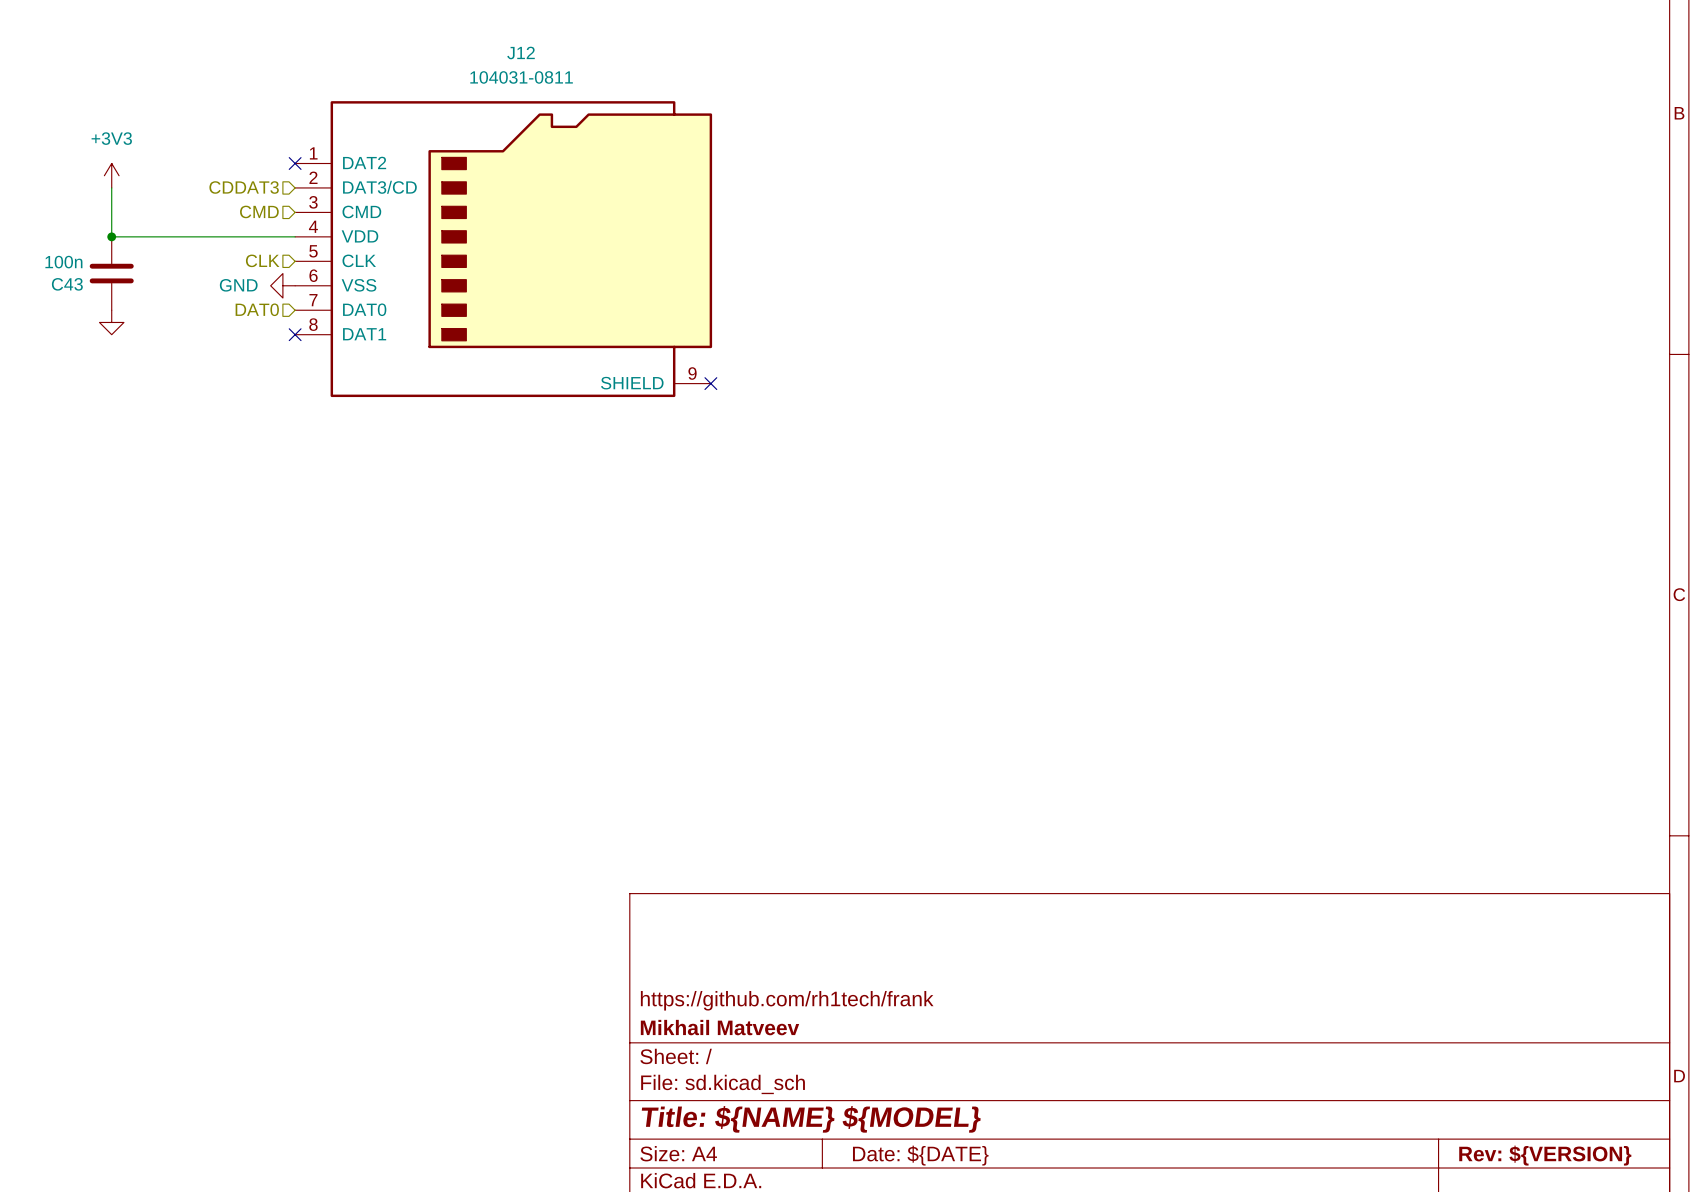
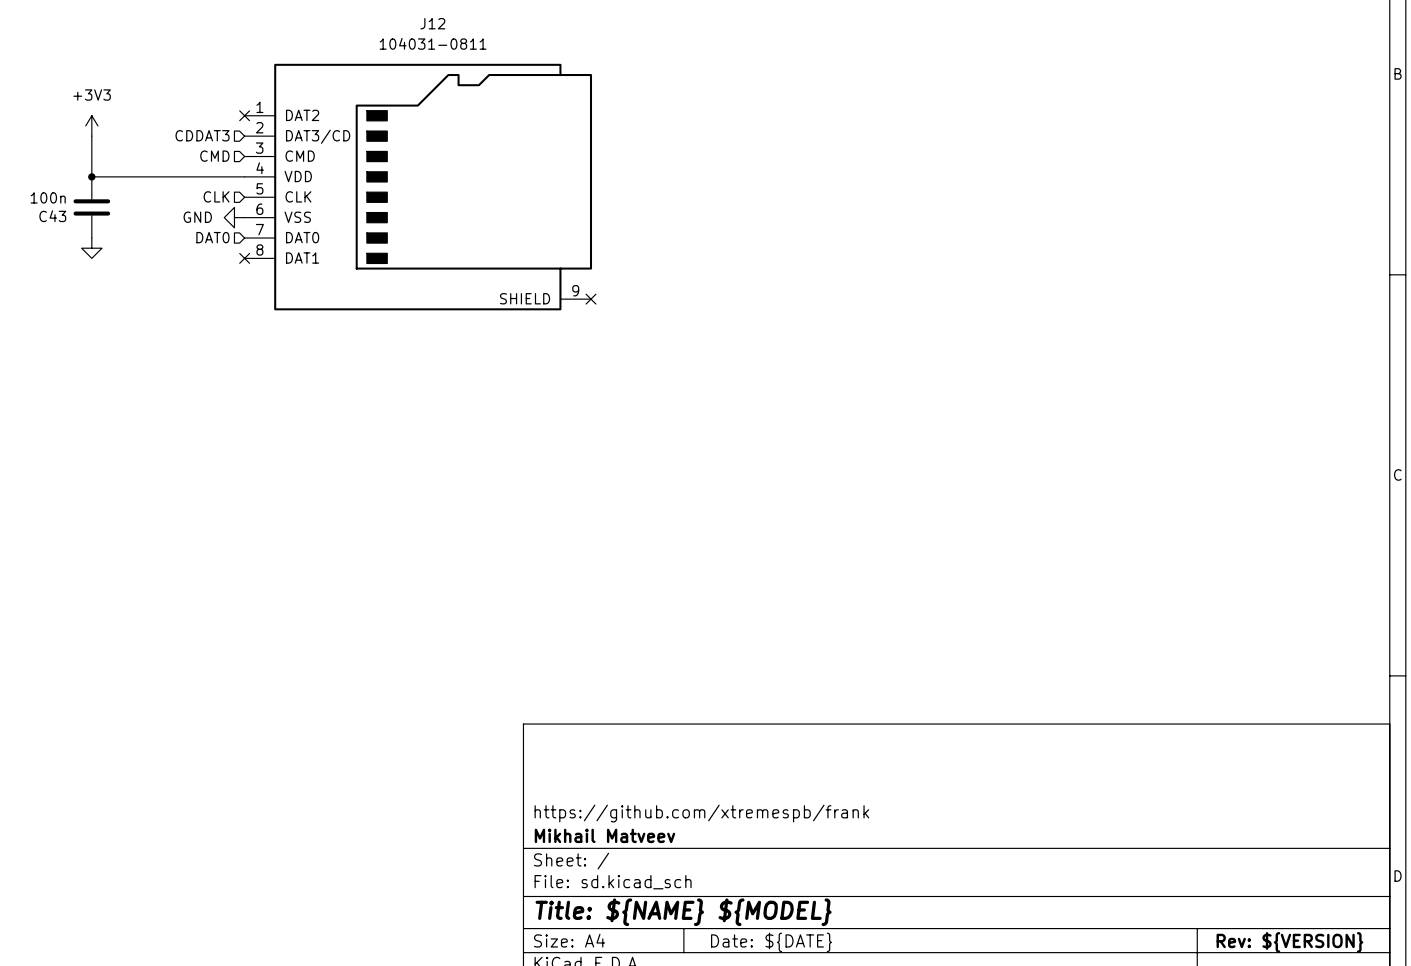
title block: https://github.com/rh1tech/frank (787, 1000) -> https://github.com/xtremespb/frank (701, 813)

